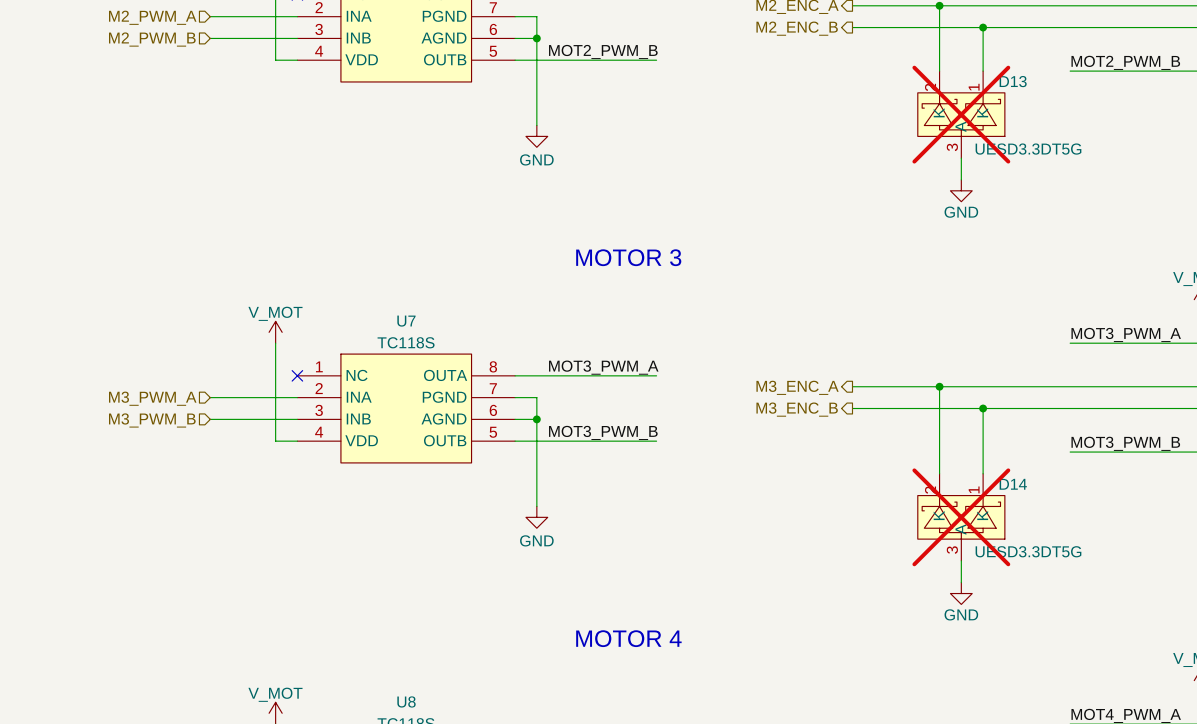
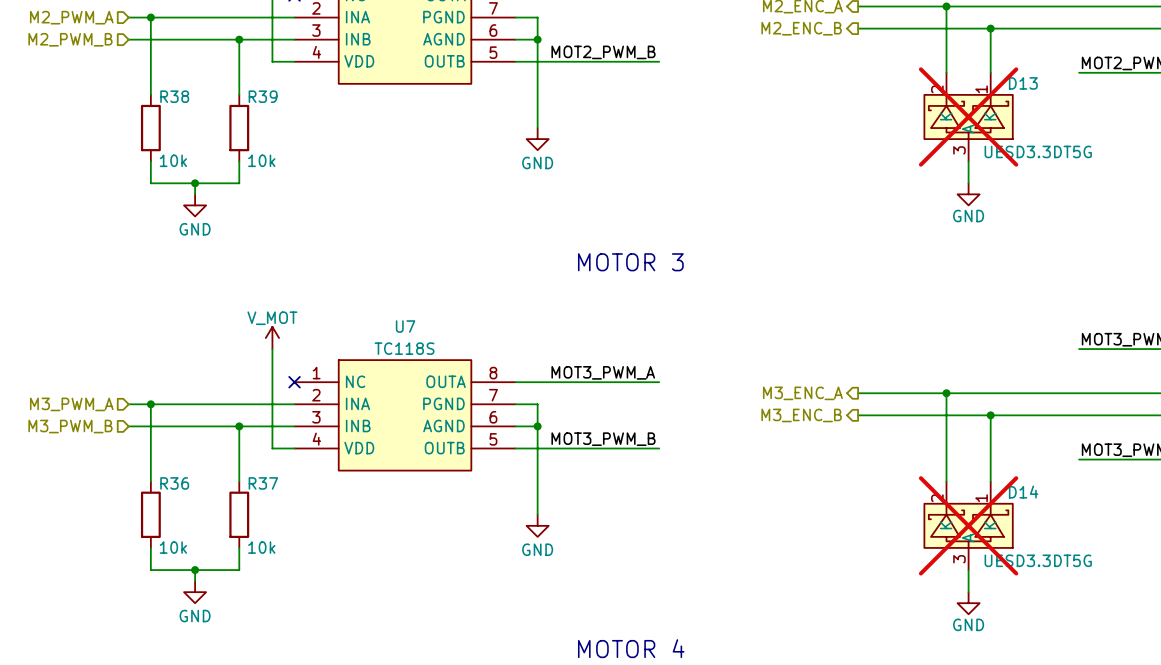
wire: none -> (128, 17) (206, 17)
wire: none -> (150, 17) (150, 94)
junction: none -> (150, 17)
hierarchical label position: M2_PWM_A (152, 17) -> M2_PWM_A (71, 17)
wire: none -> (128, 39) (206, 39)
wire: none -> (239, 39) (239, 94)
junction: none -> (239, 39)
hierarchical label position: M2_PWM_B (152, 39) -> M2_PWM_B (70, 39)
R38: none -> 10k (150, 128)
R39: none -> 10k (239, 128)
wire: none -> (150, 161) (150, 183) (239, 183) (239, 161)
wire: none -> (195, 183) (195, 194)
junction: none -> (195, 183)
power symbol: none -> GND (195, 205)
wire: none -> (128, 404) (206, 404)
wire: none -> (150, 404) (150, 481)
junction: none -> (150, 404)
hierarchical label position: M3_PWM_A (152, 398) -> M3_PWM_A (71, 404)
wire: none -> (128, 426) (206, 426)
wire: none -> (239, 426) (239, 481)
junction: none -> (239, 426)
hierarchical label position: M3_PWM_B (152, 420) -> M3_PWM_B (70, 426)
R36: none -> 10k (150, 514)
R37: none -> 10k (239, 514)
wire: none -> (150, 547) (150, 570) (239, 570) (239, 547)
wire: none -> (195, 570) (195, 581)
junction: none -> (195, 570)
power symbol: none -> GND (195, 592)

